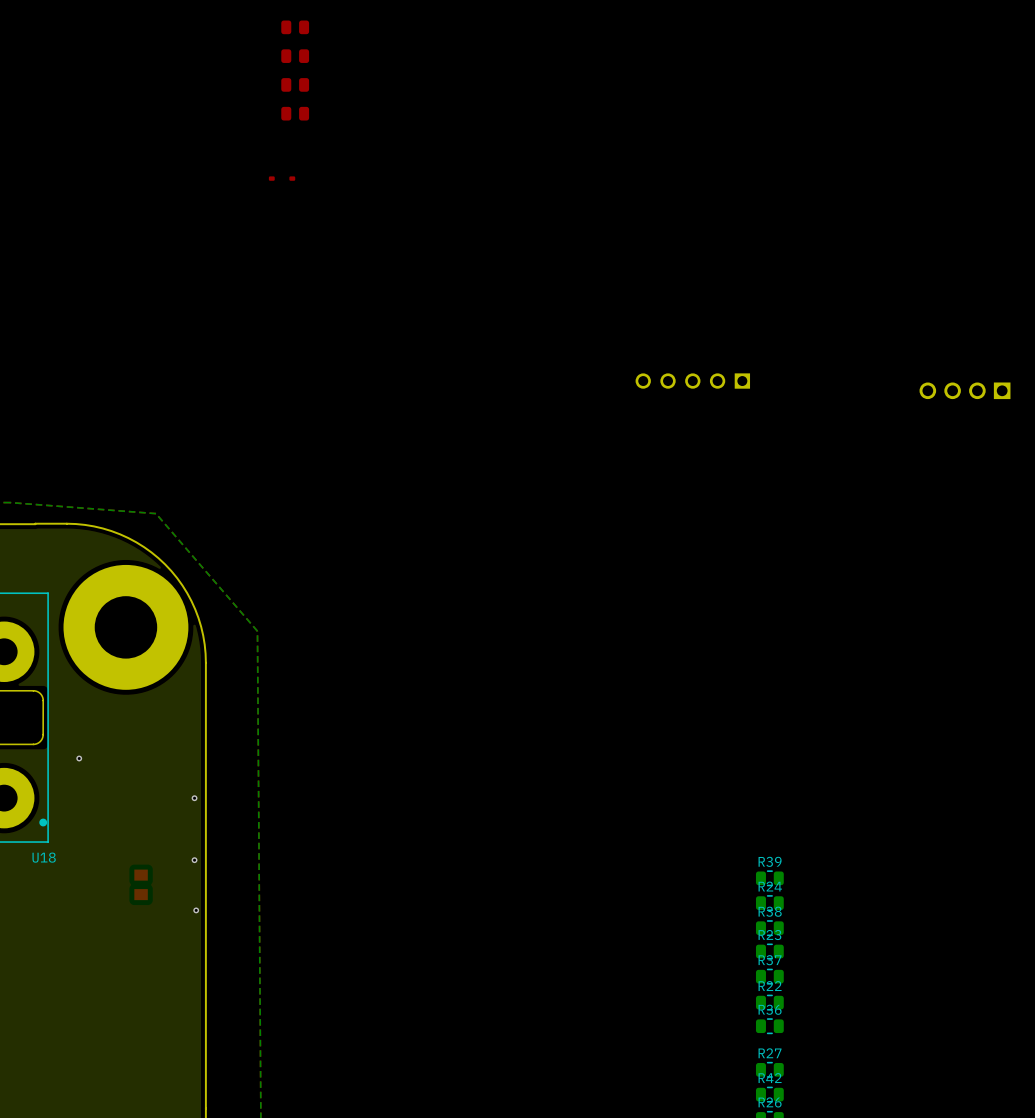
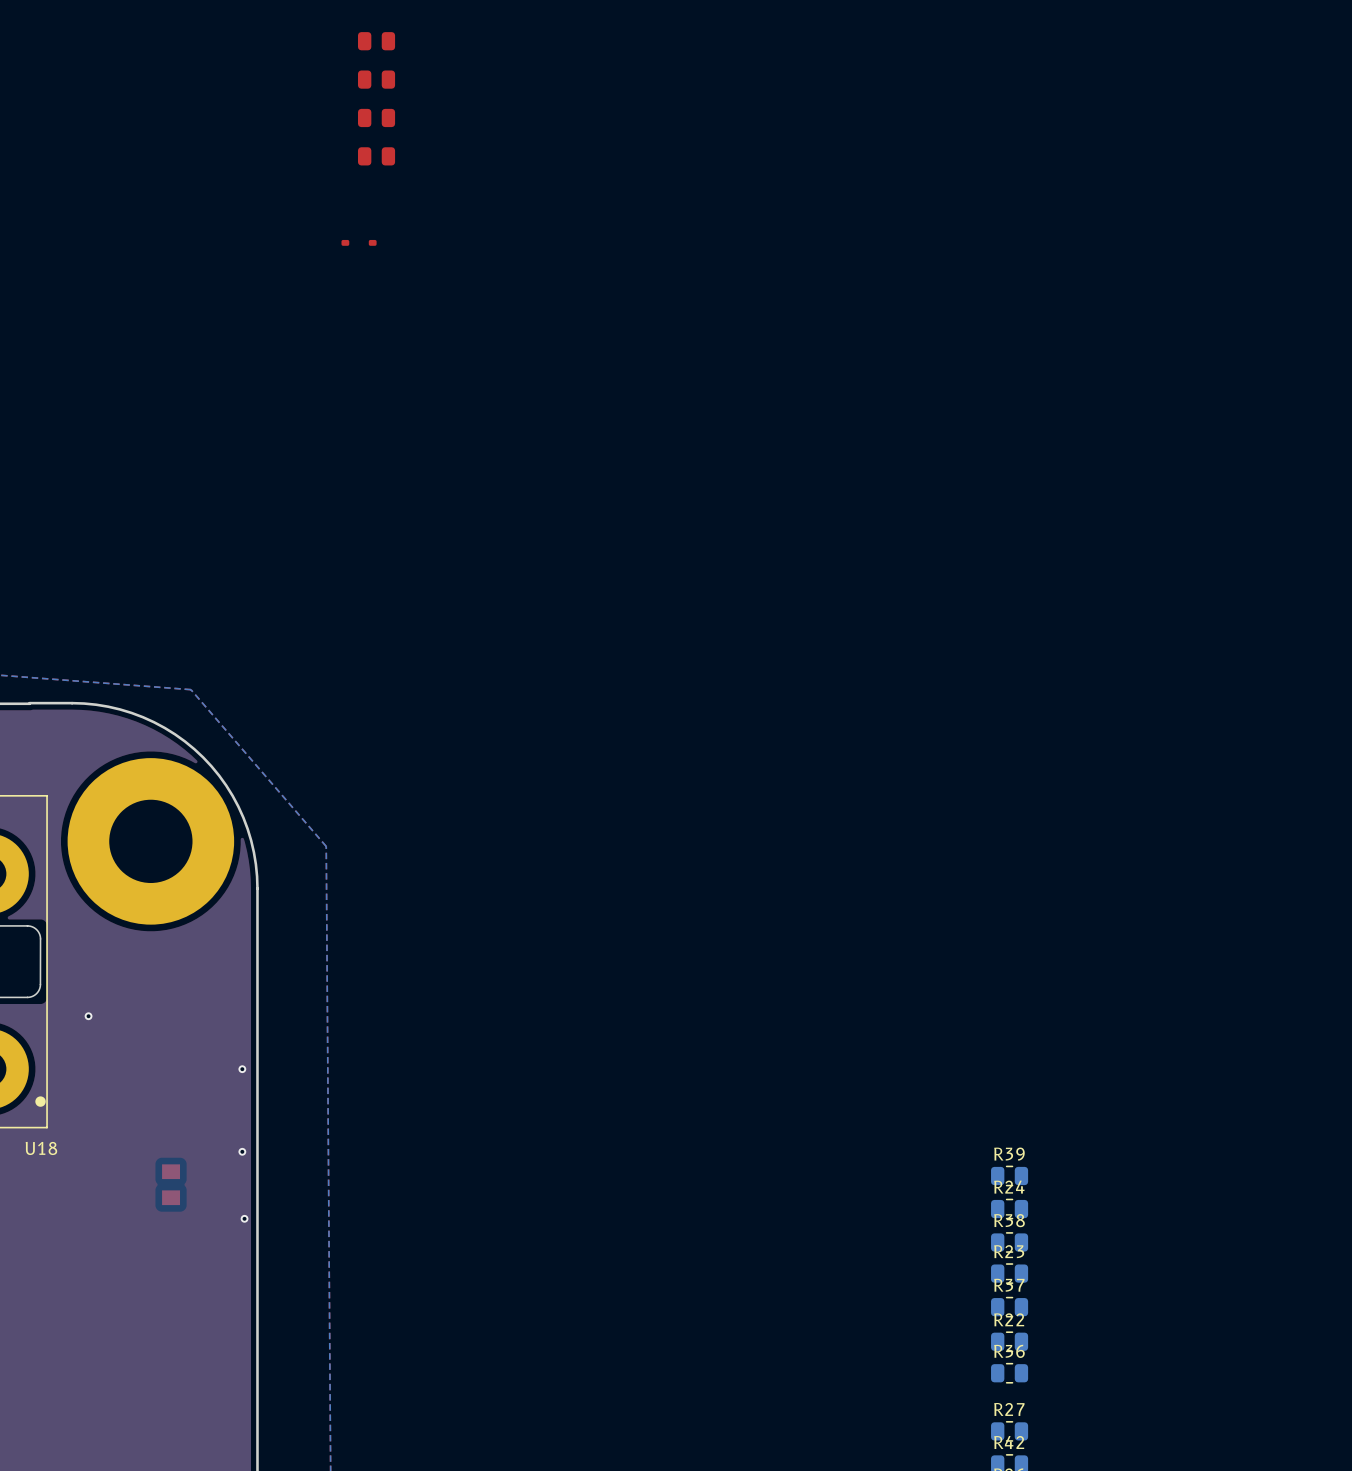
part: (692, 381) -> none
part: (965, 390) -> none

